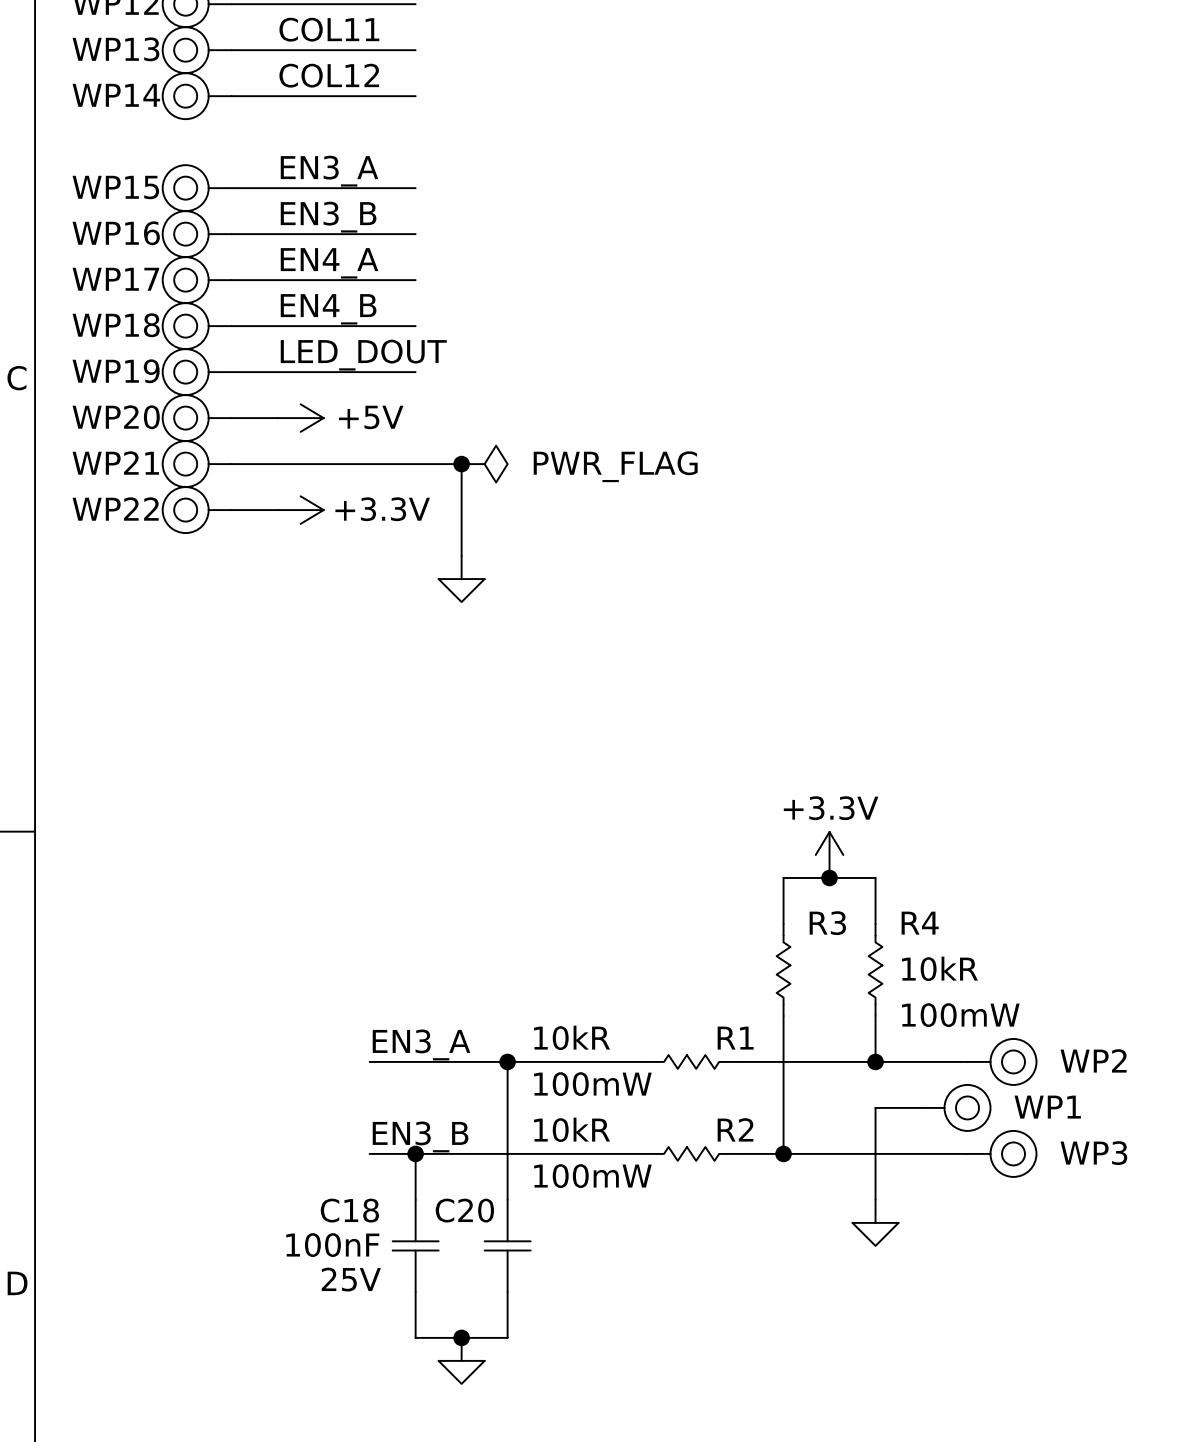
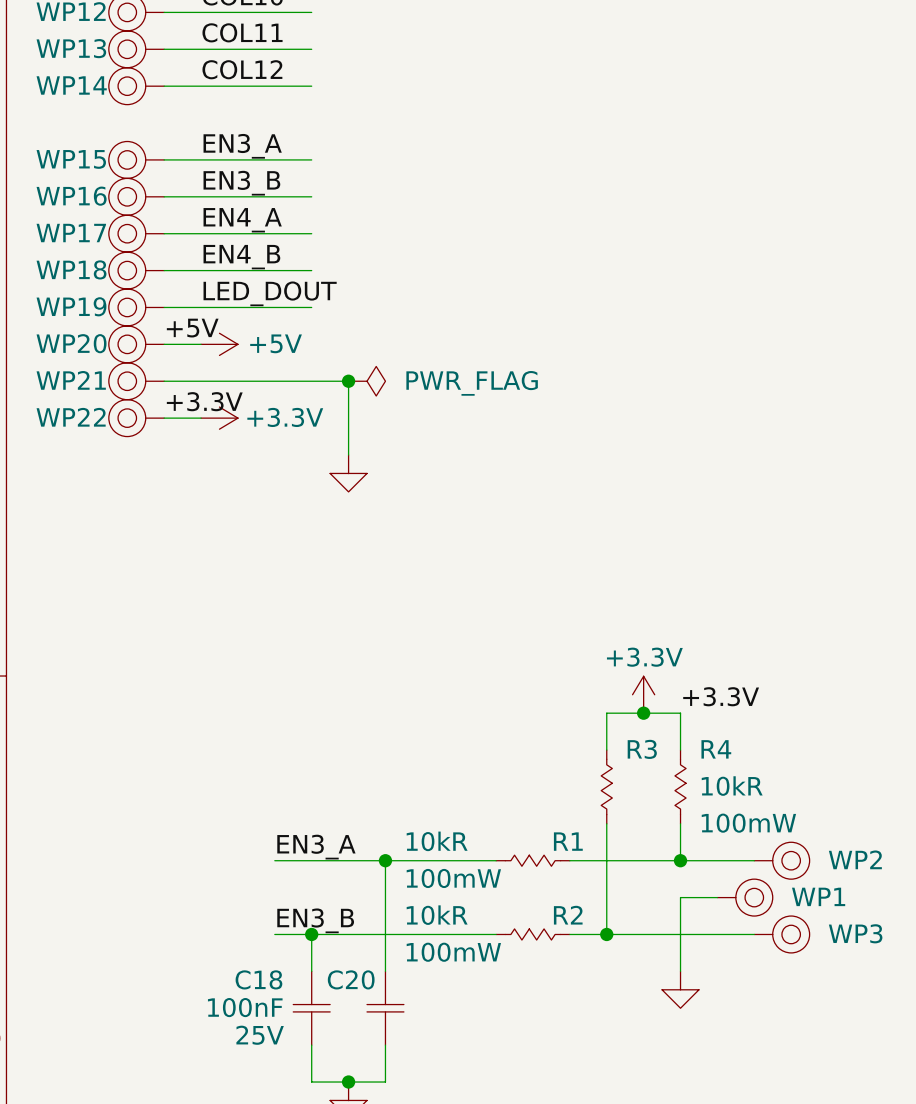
label: none -> +5V (192, 328)
label: none -> +3.3V (204, 401)
label: none -> +3.3V (721, 696)

